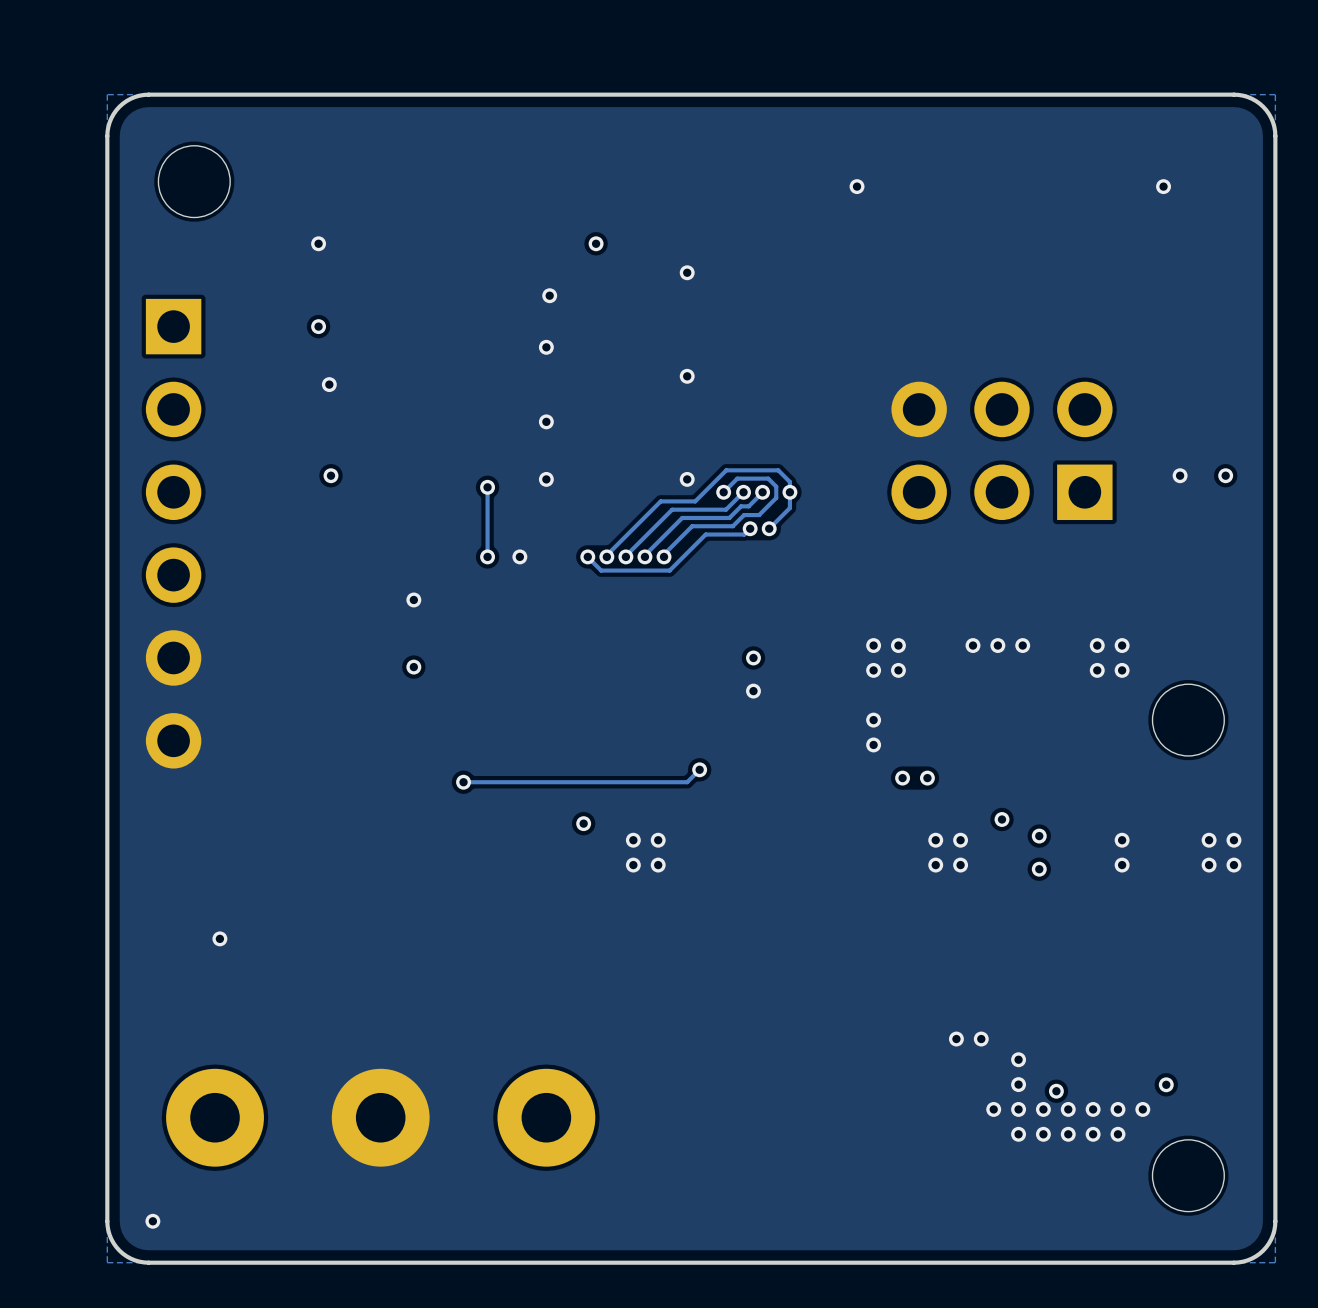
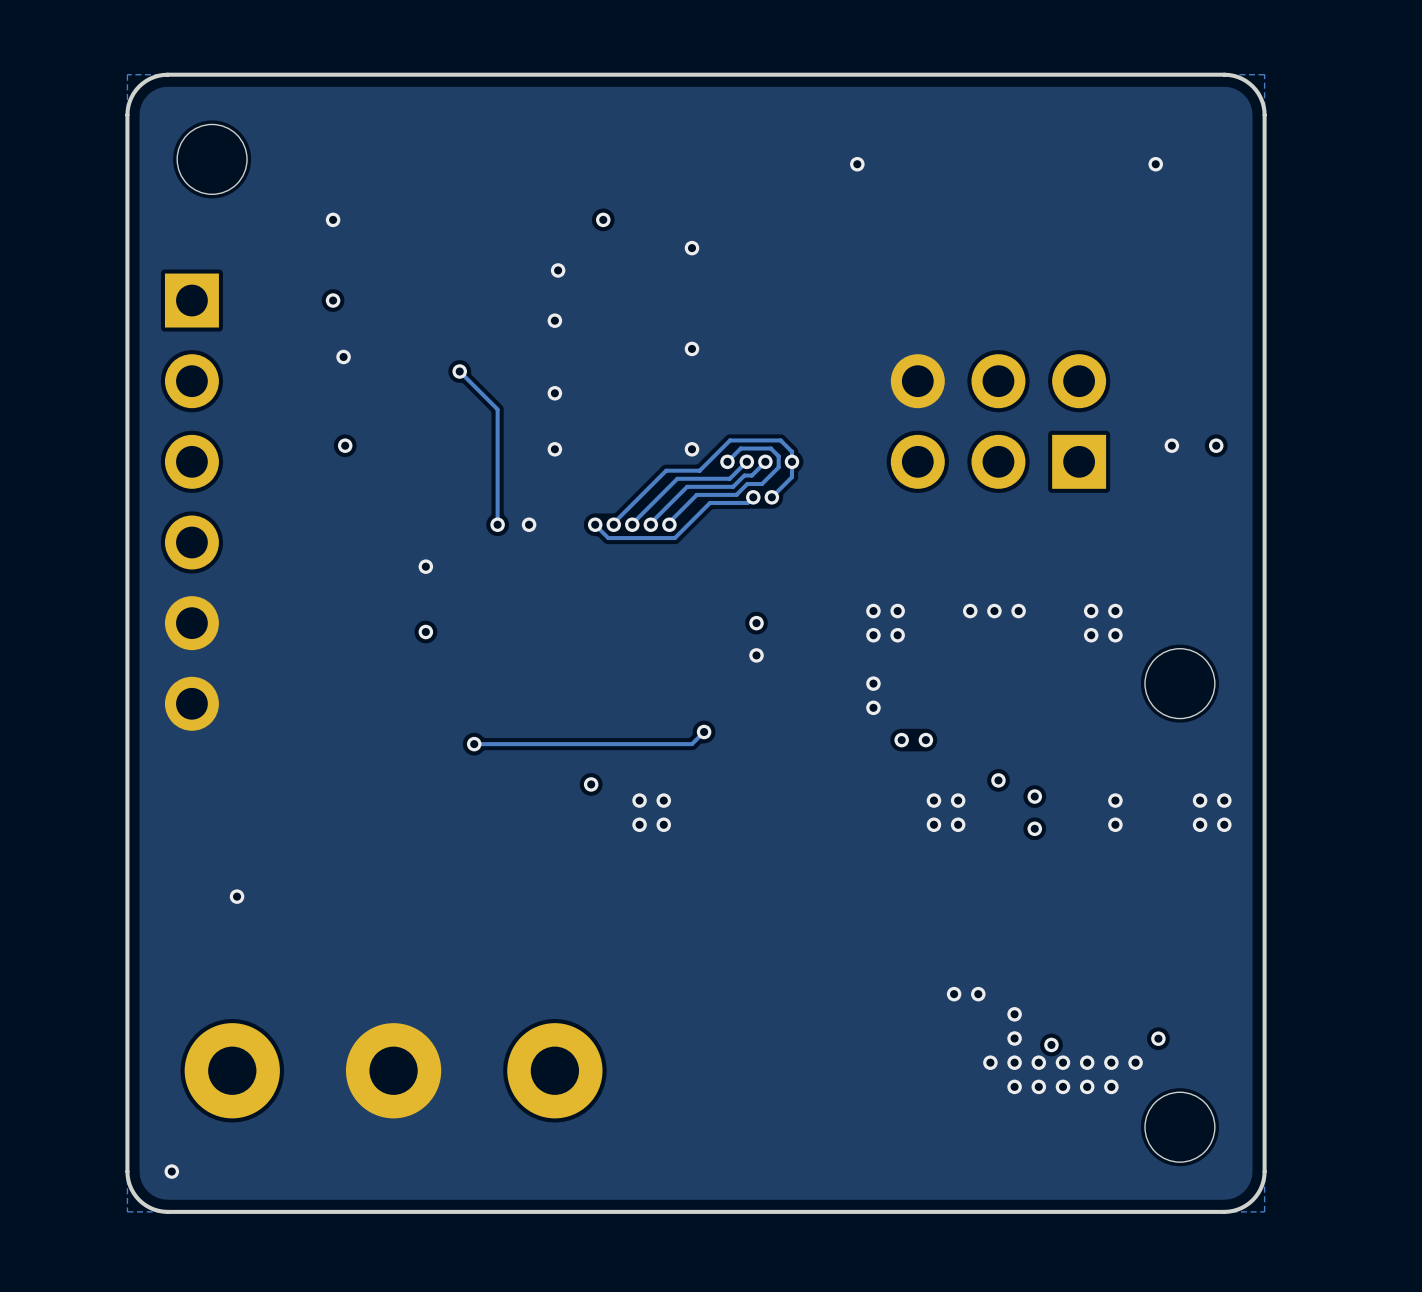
track: none -> (459, 371) (497, 409)
track: none -> (497, 410) (497, 457)
via position: (487, 487) -> (459, 371)

